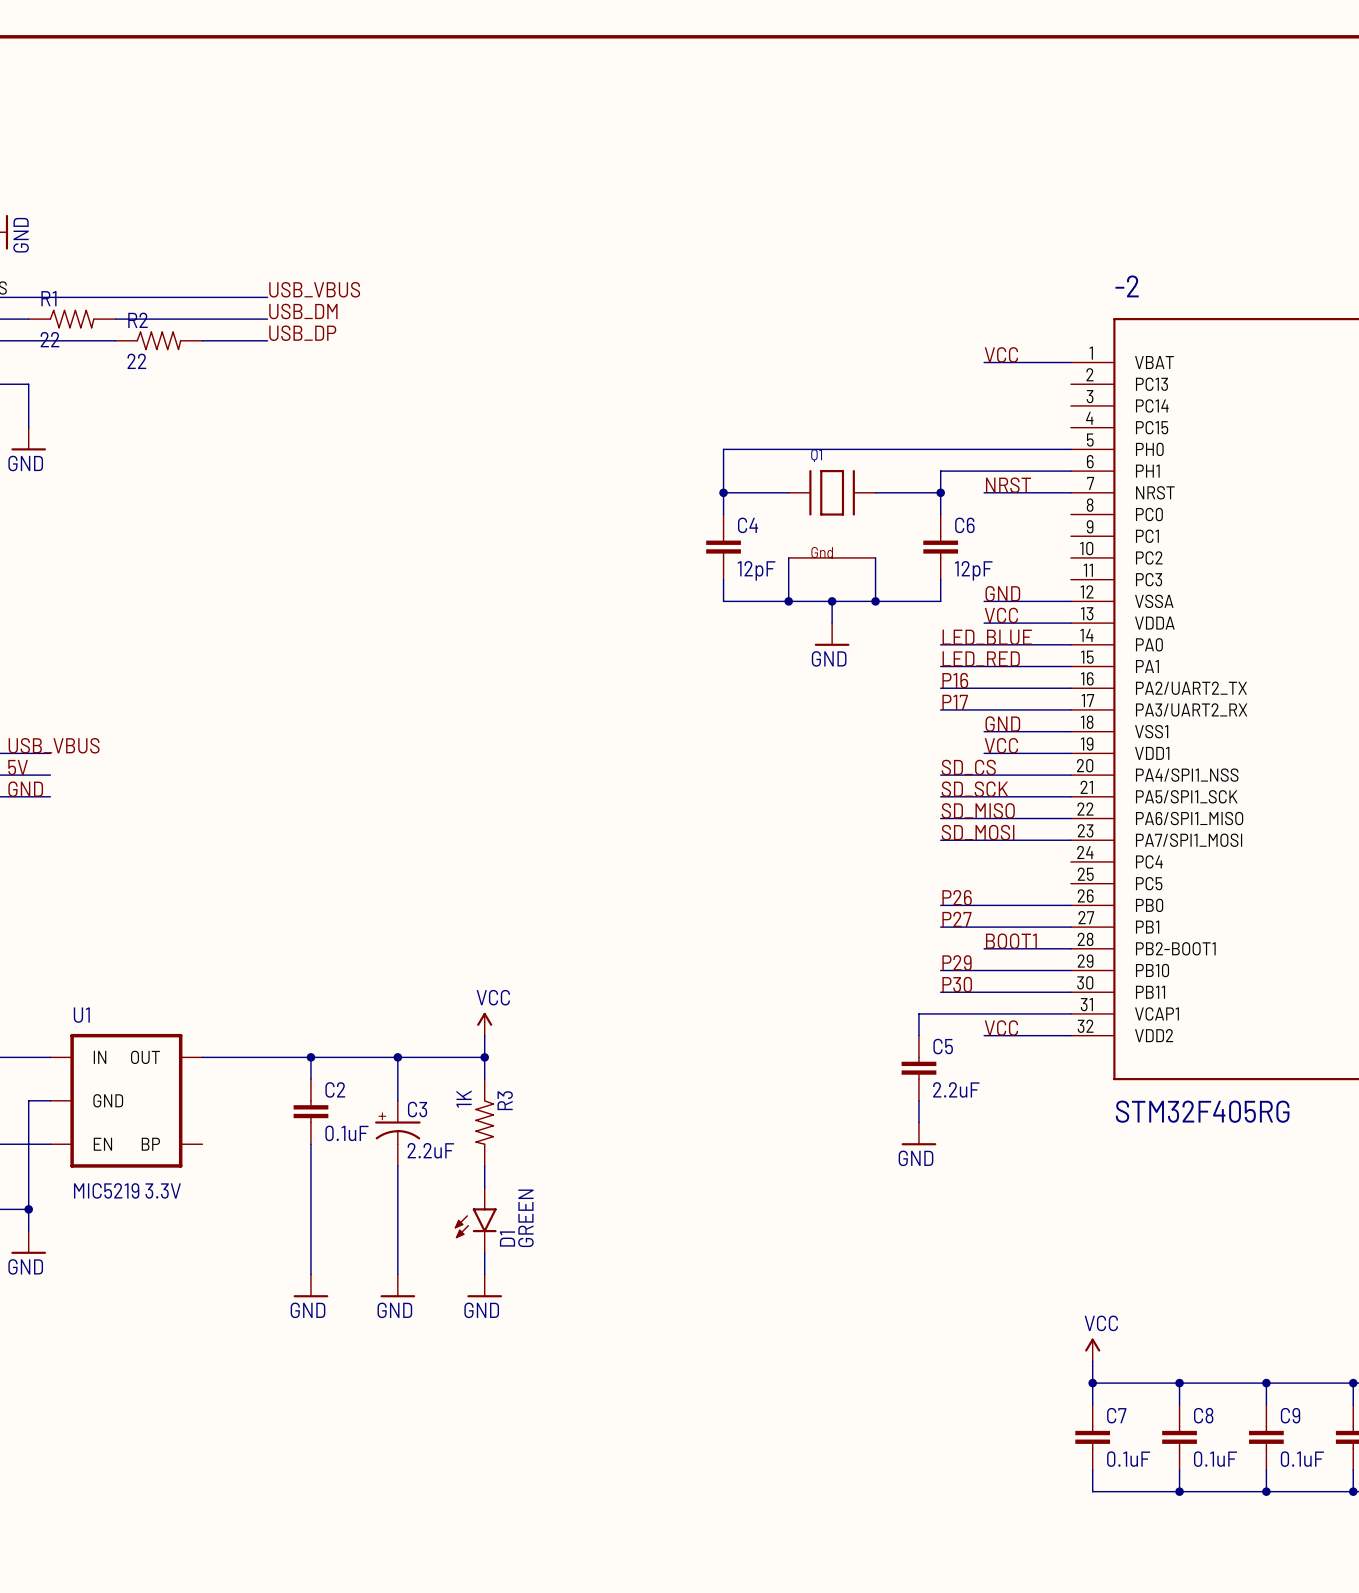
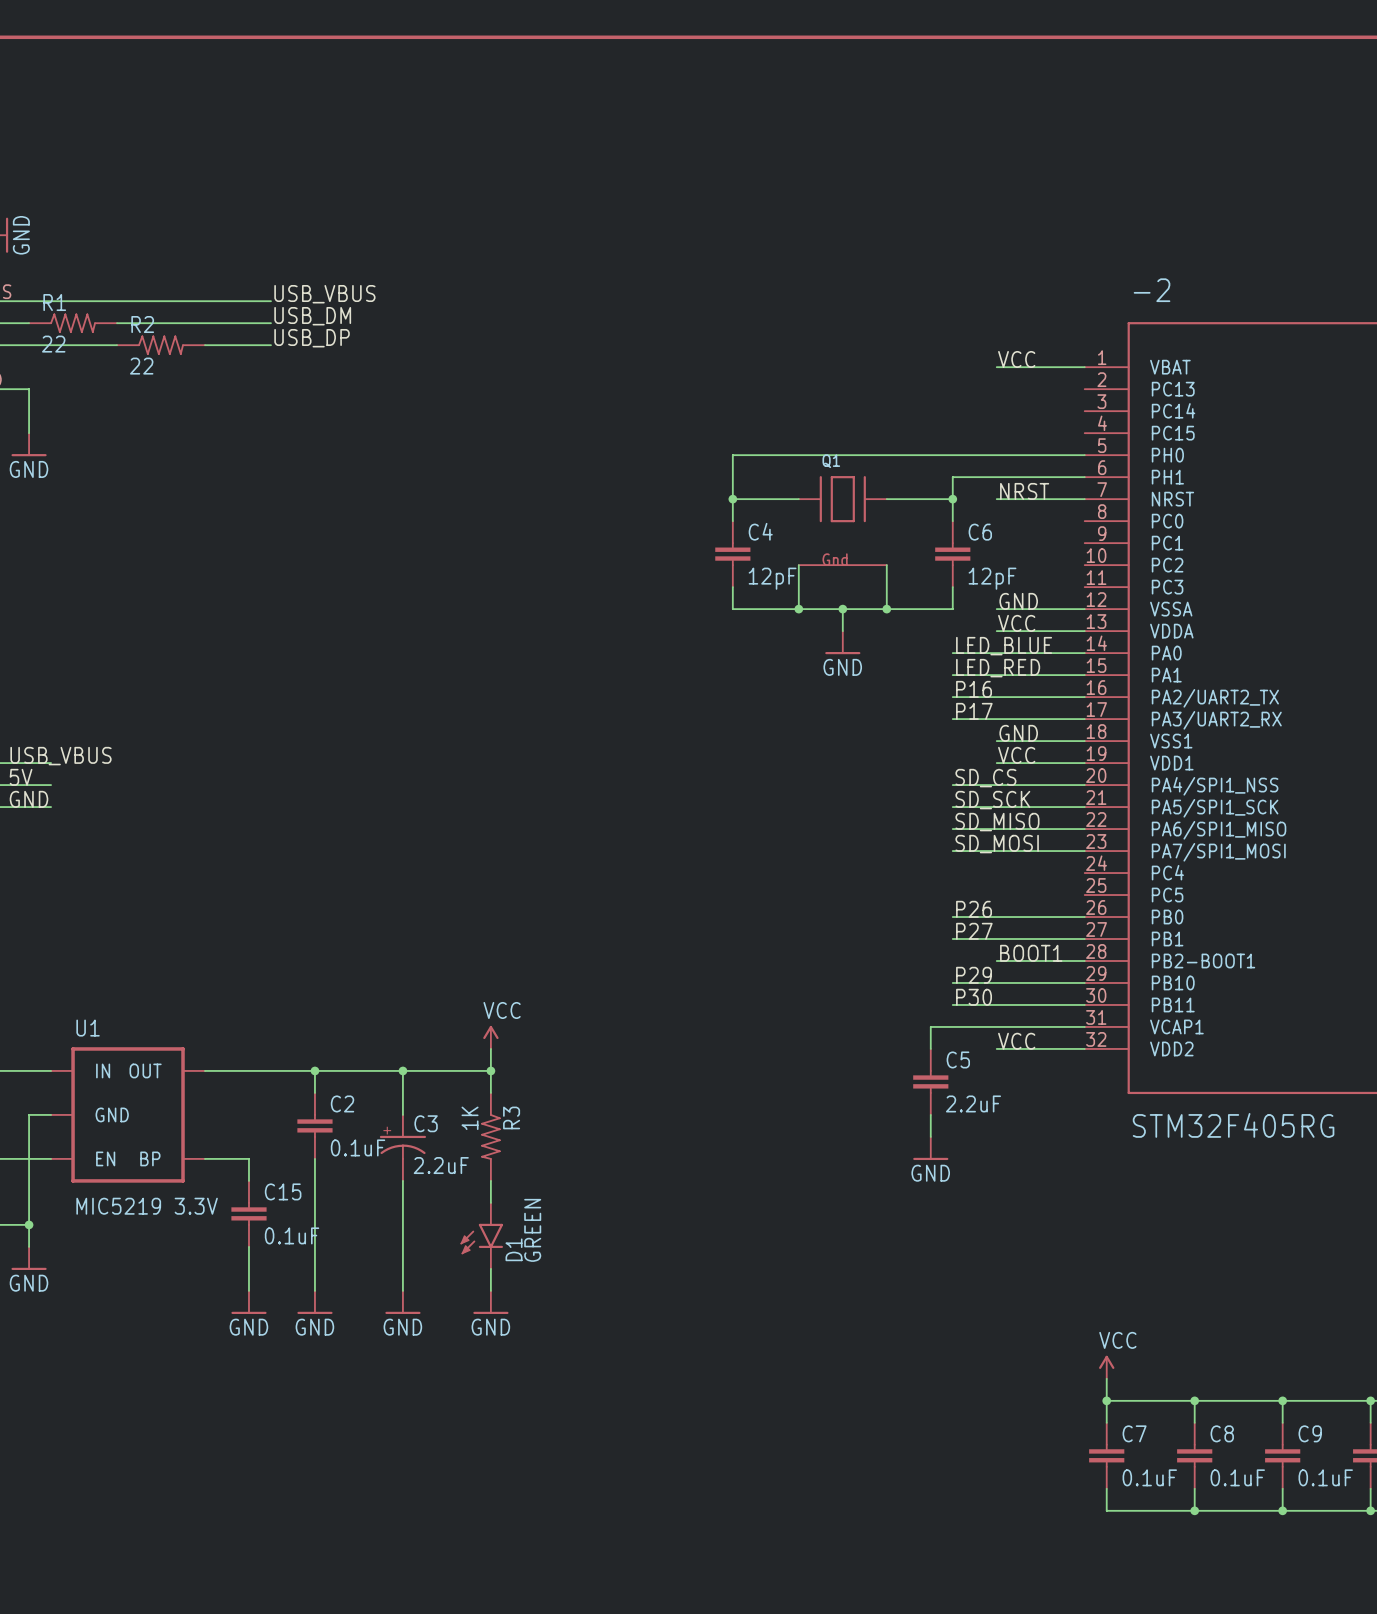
wire: none -> (205, 1158) (248, 1158) (248, 1180)
C15: none -> 0.1uF (248, 1213)
wire: none -> (248, 1246) (248, 1290)
power symbol: none -> GND (248, 1302)

